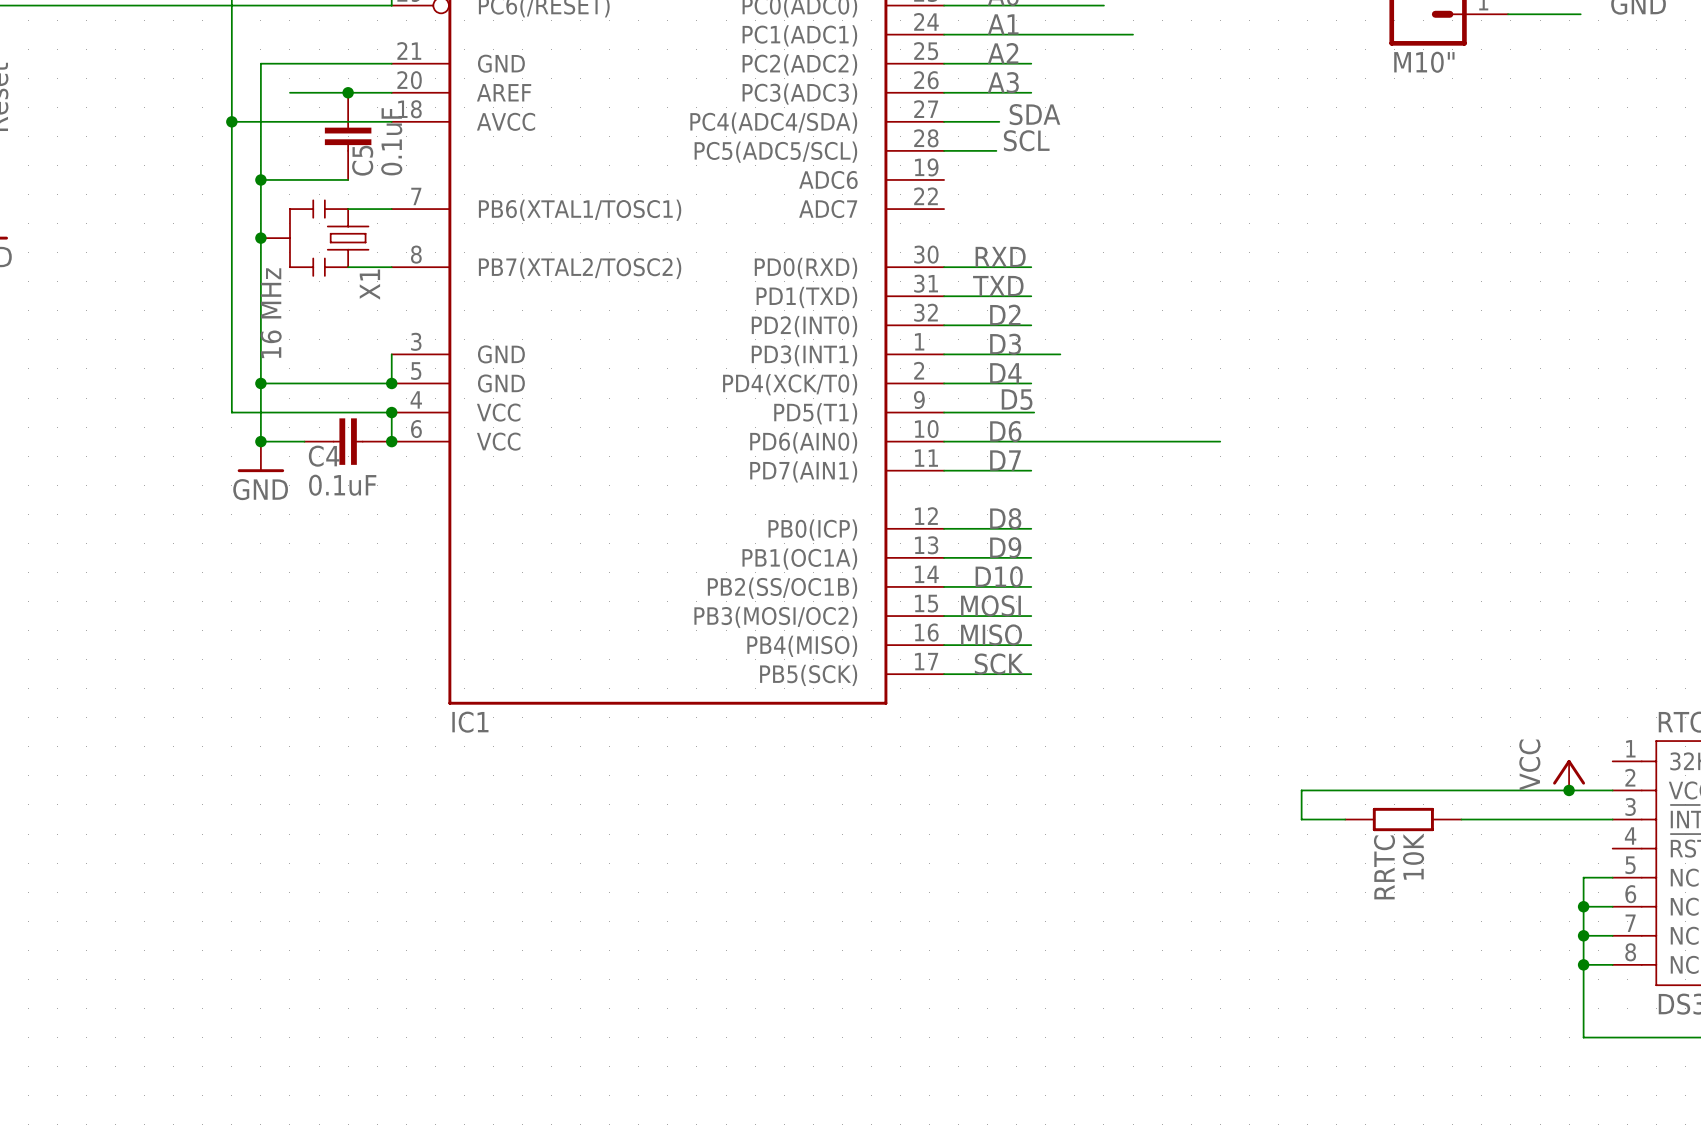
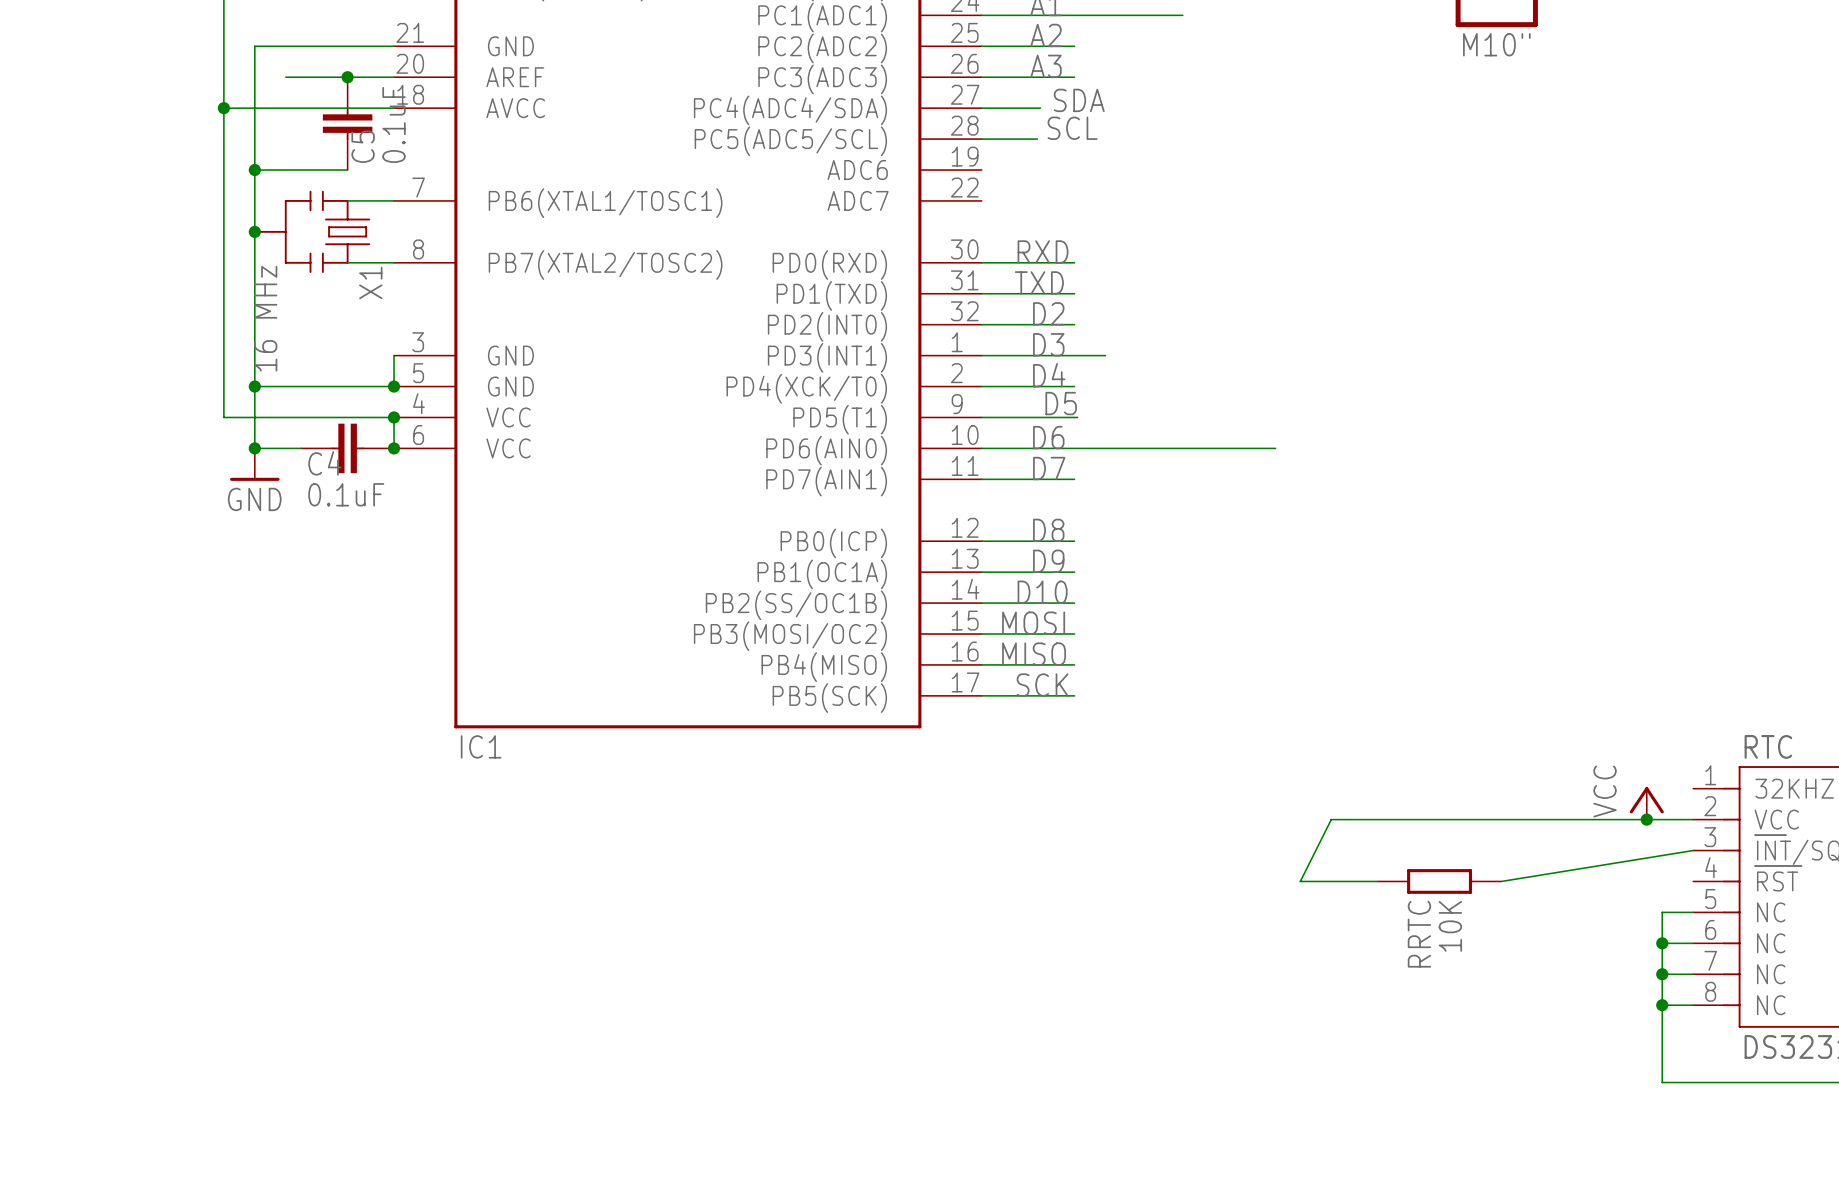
wire: (1301, 790) (1301, 819) (1345, 819) -> (1362, 819) (1331, 819) (1300, 881) (1377, 881)
RRTC position: (1403, 819) -> (1439, 881)
wire: (1461, 819) (1612, 819) -> (1501, 881) (1693, 850)

